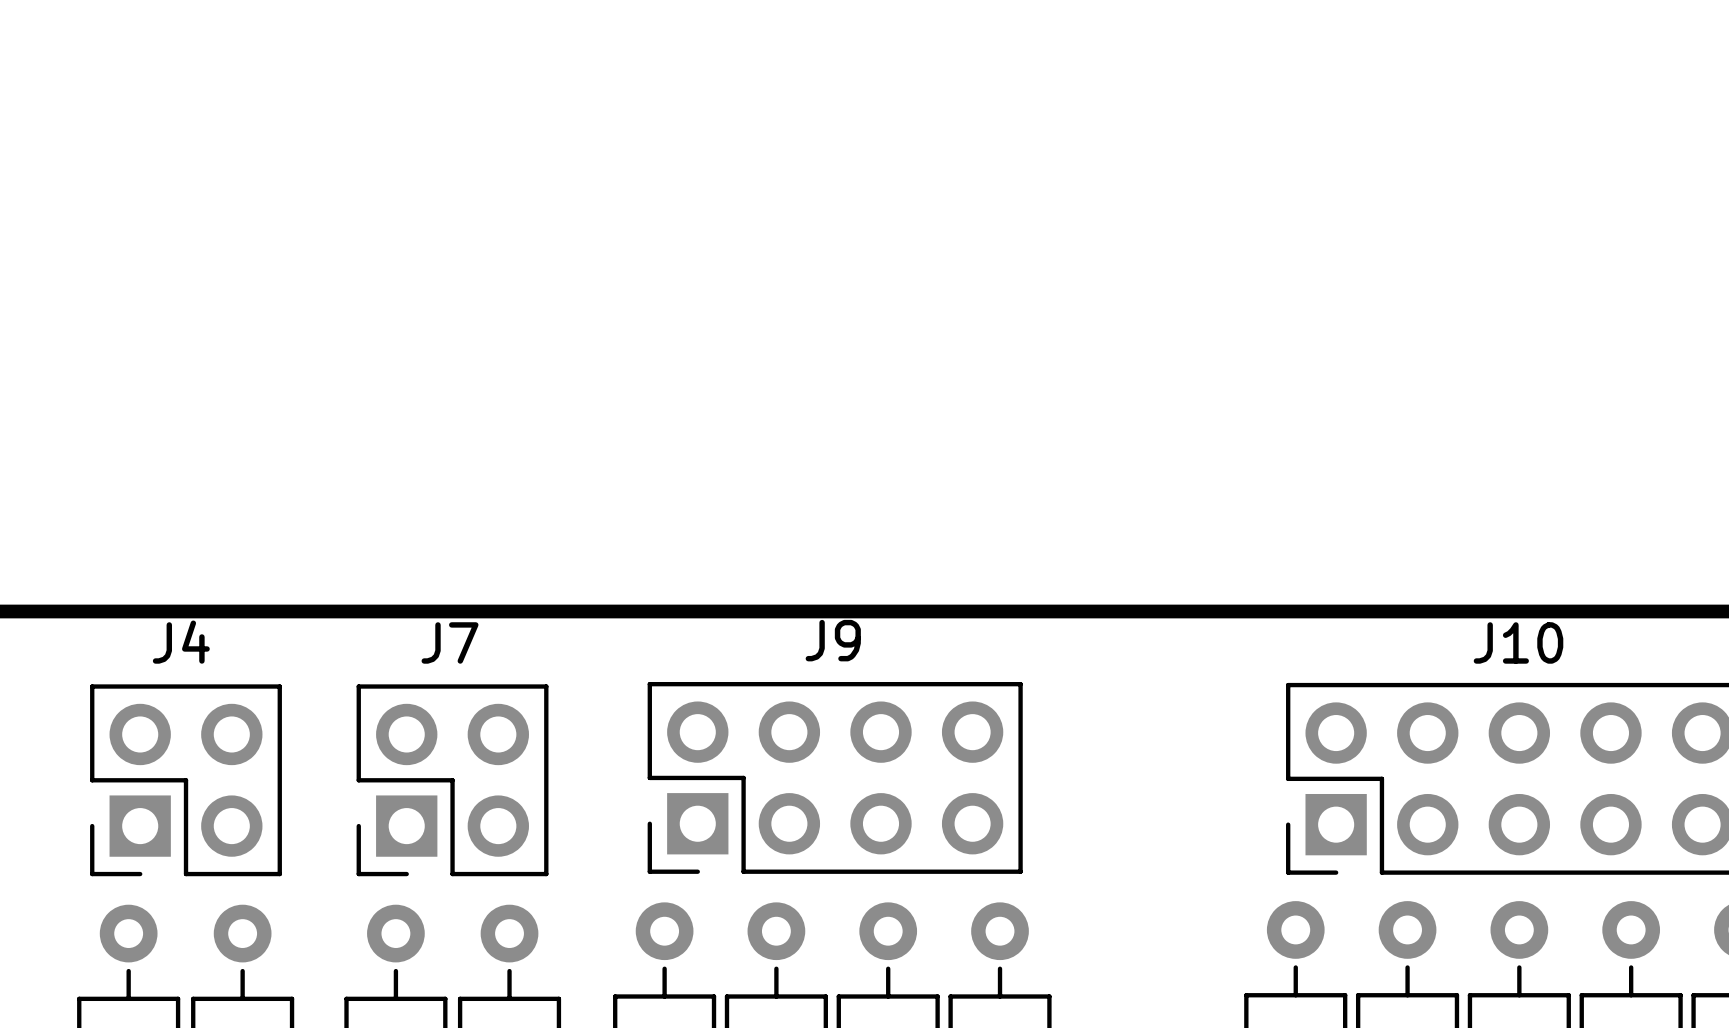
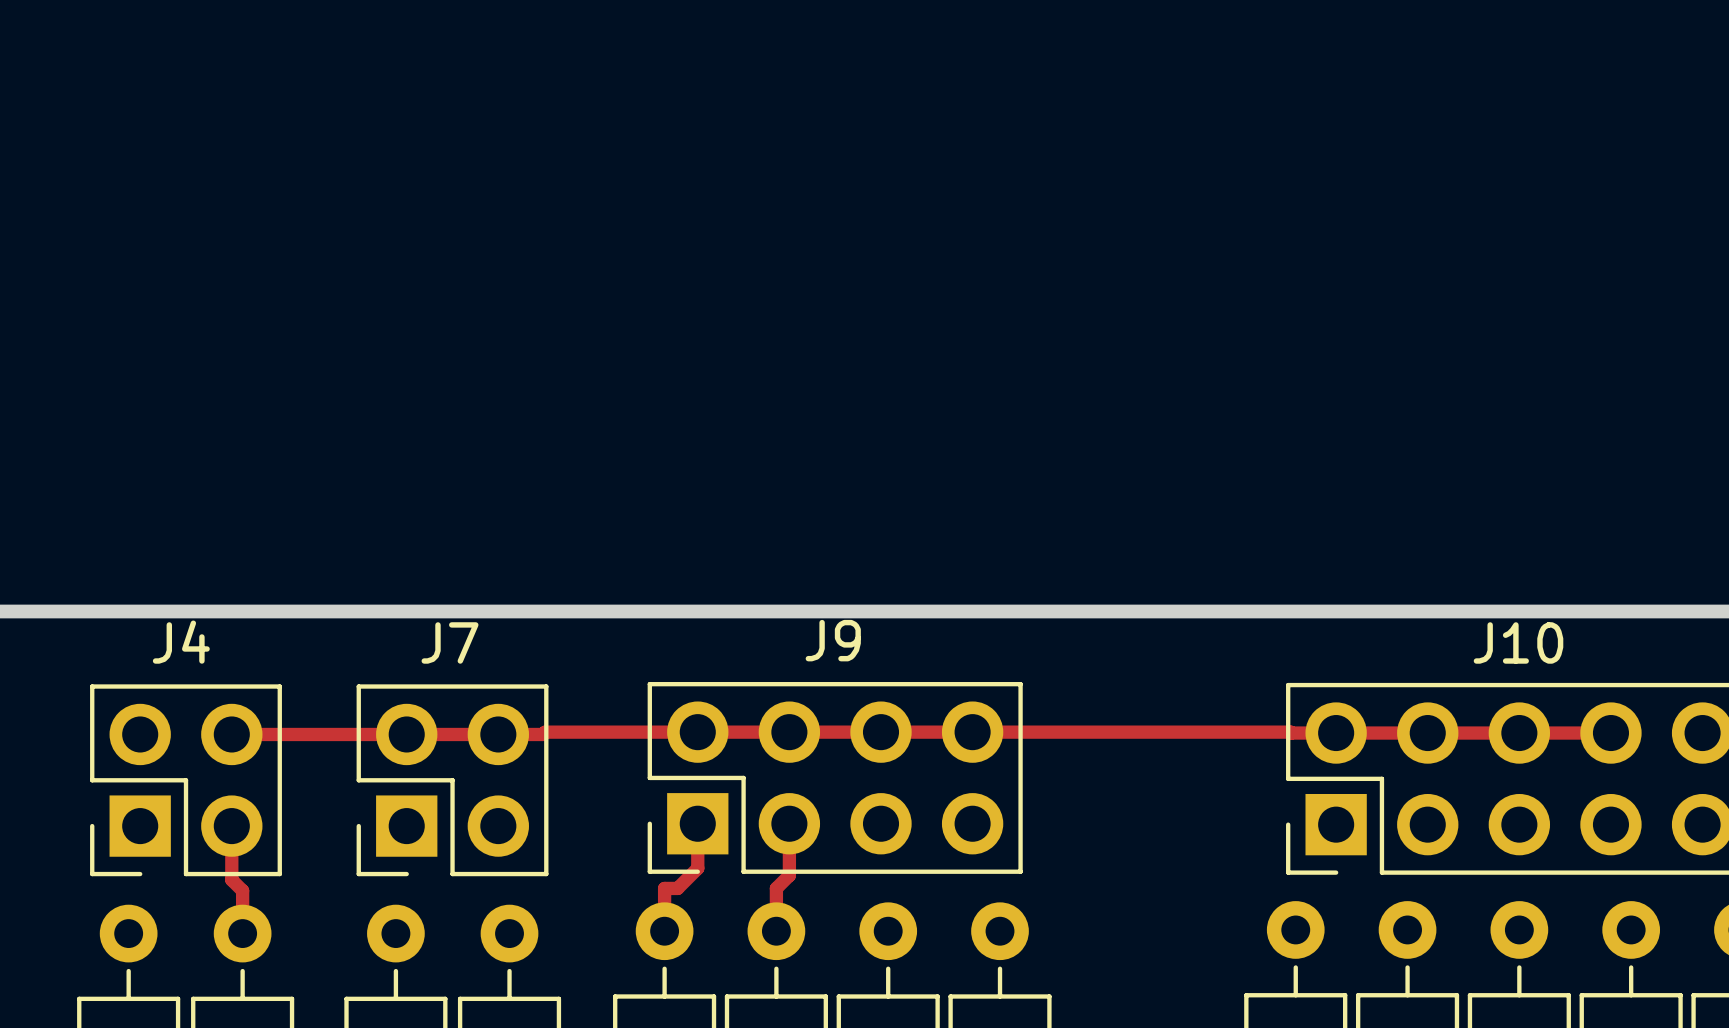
track: none -> (1610, 733) (545, 732) (542, 734) (231, 734)
track: none -> (697, 823) (697, 868) (677, 888) (664, 888) (664, 931)
track: none -> (789, 823) (789, 875) (776, 888) (776, 931)
track: none -> (231, 826) (231, 879) (242, 890) (242, 933)

